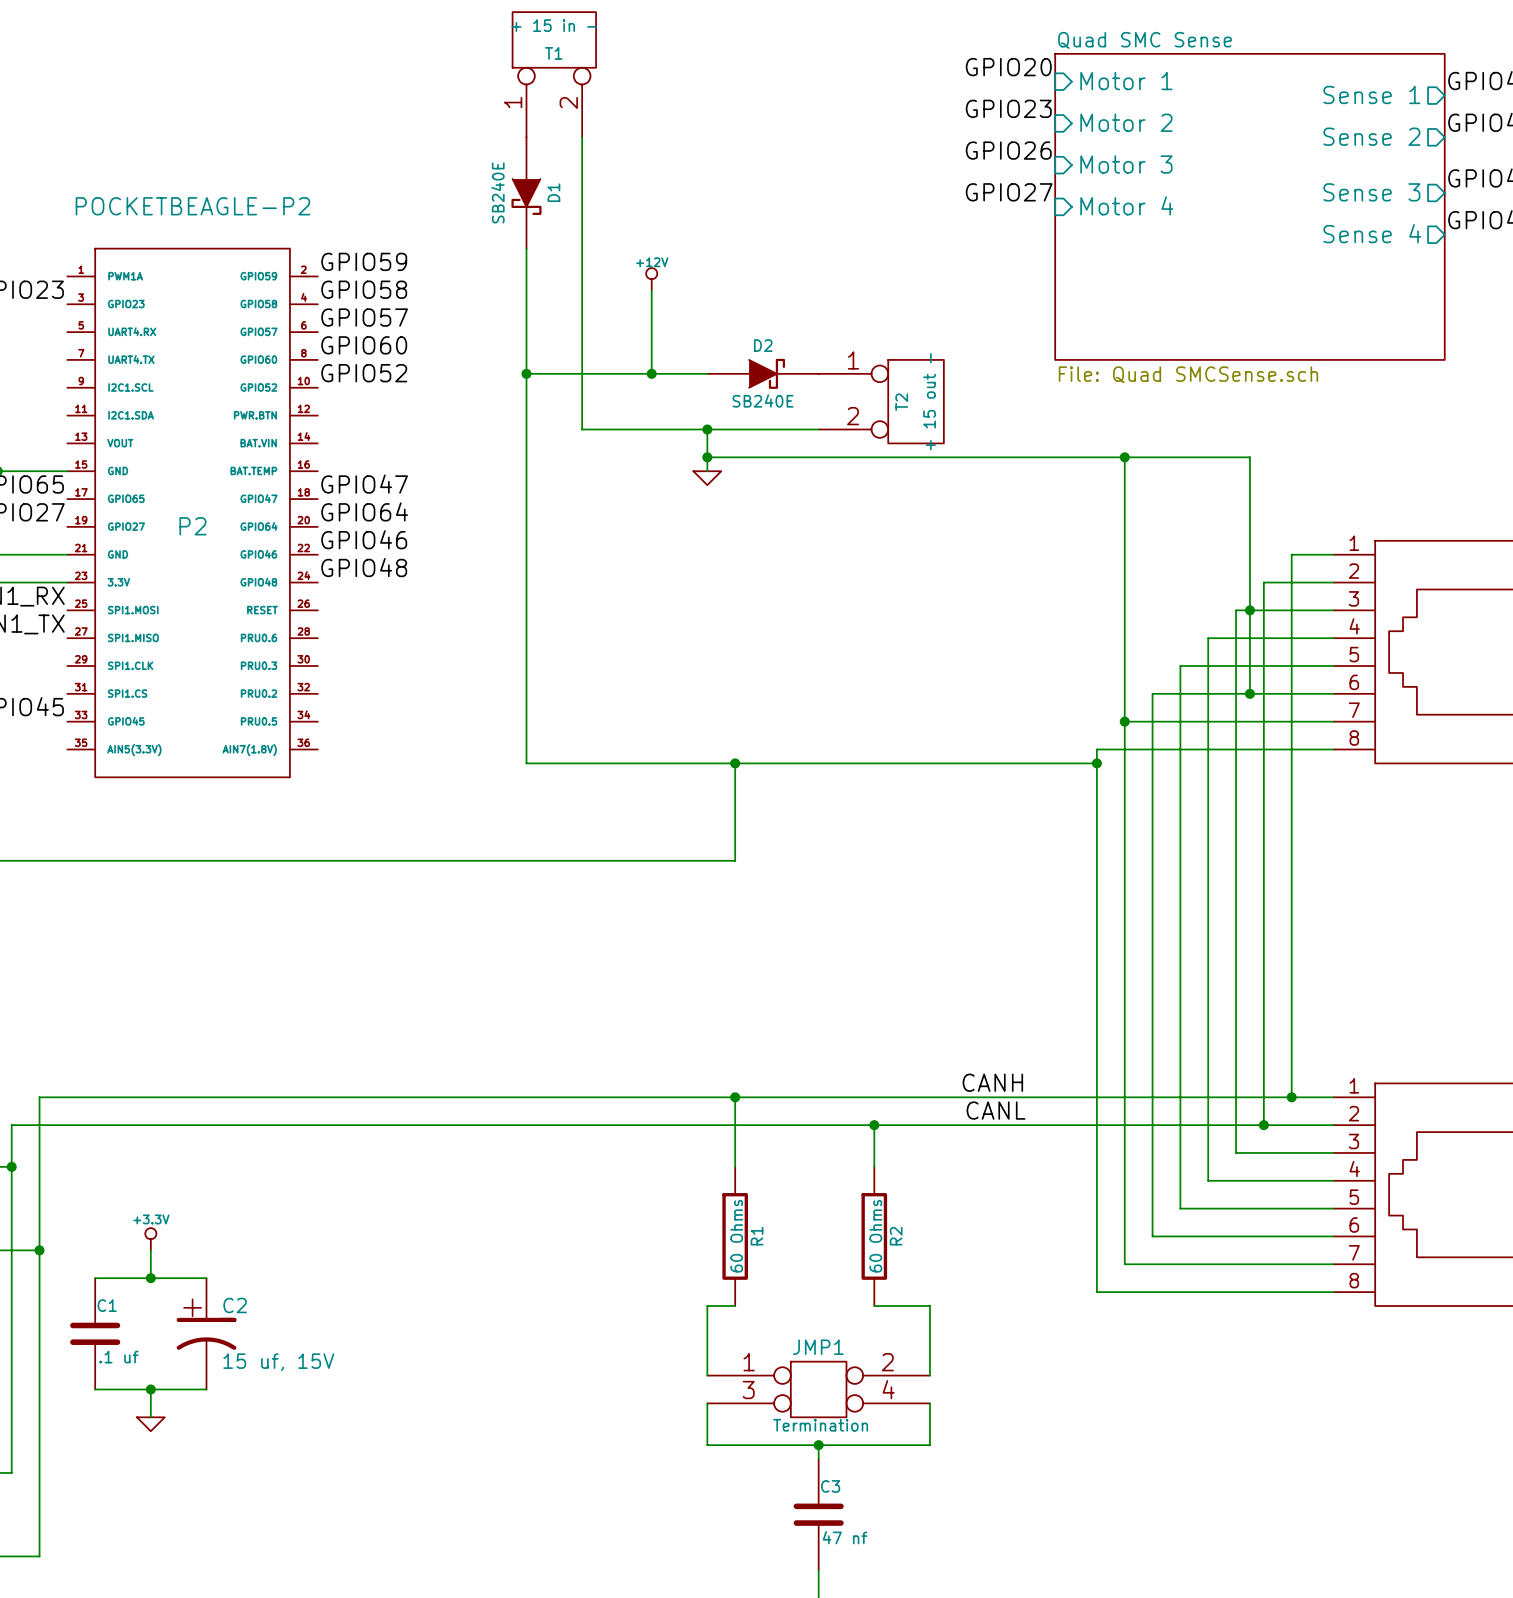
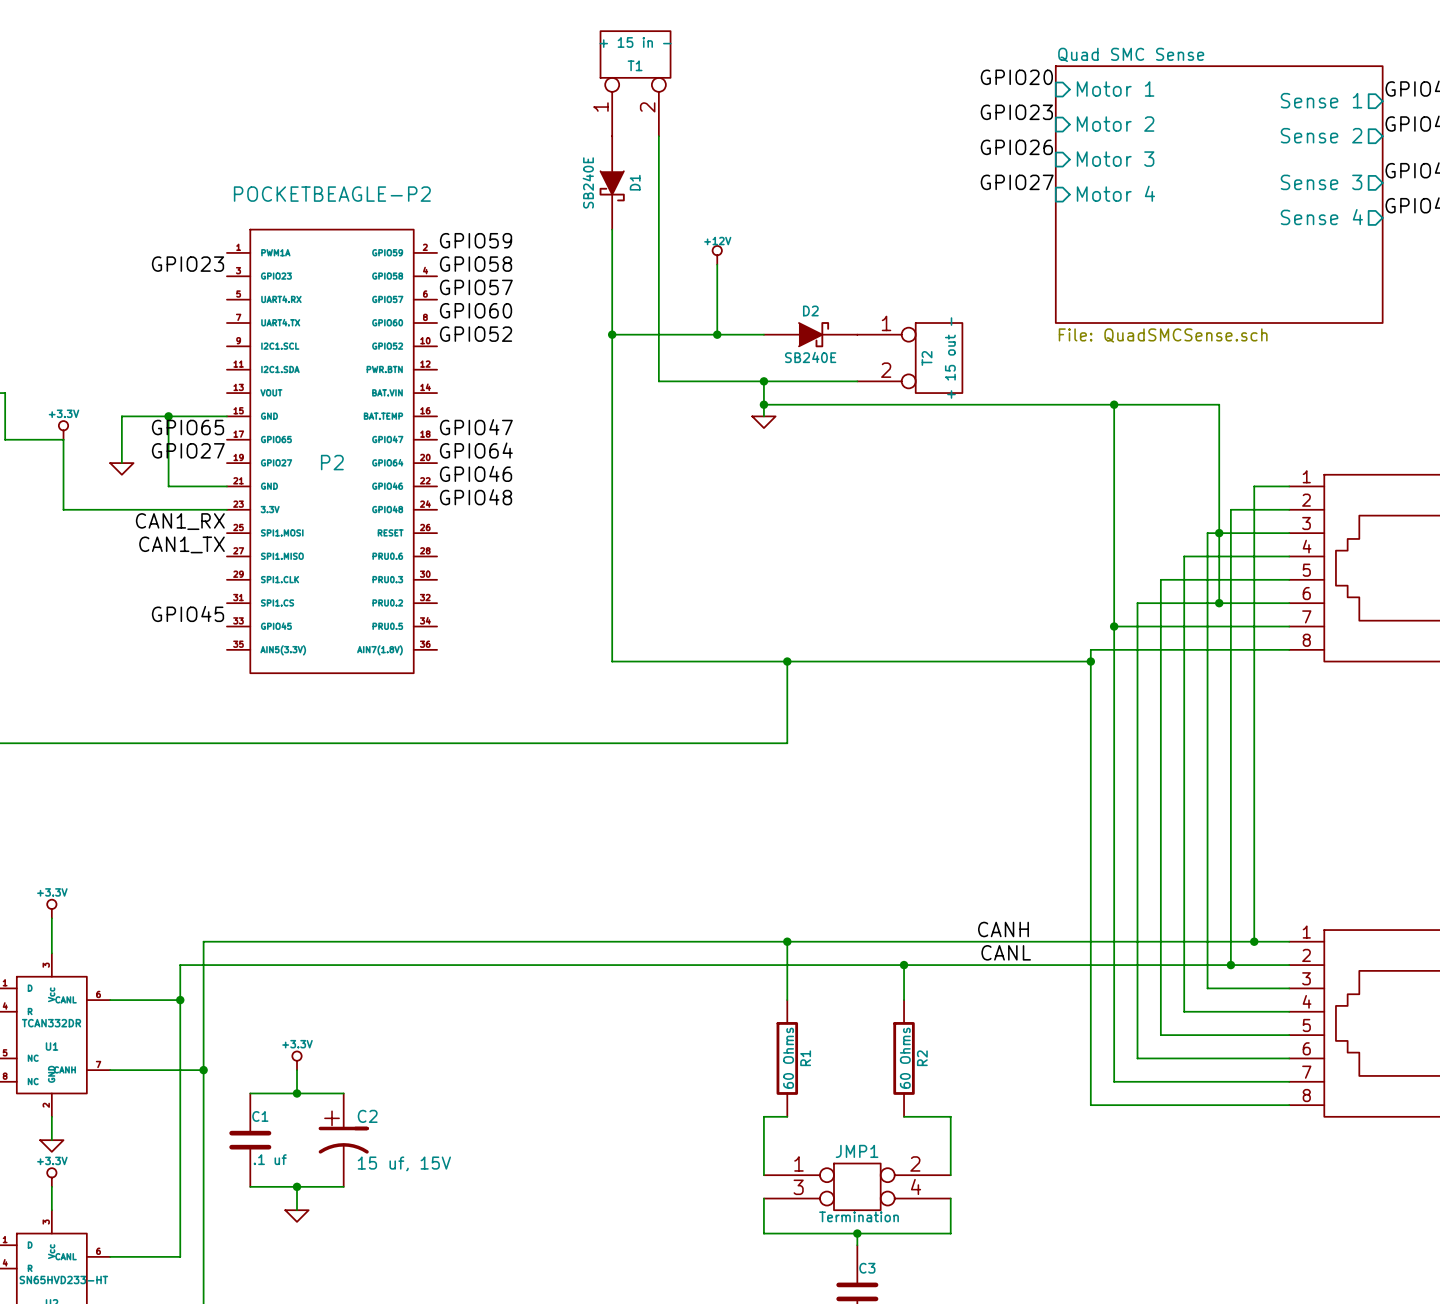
sheet Quad SMC Sense value: File: Quad SMCSense.sch (1188, 374) -> File: QuadSMCSense.sch (1163, 335)

